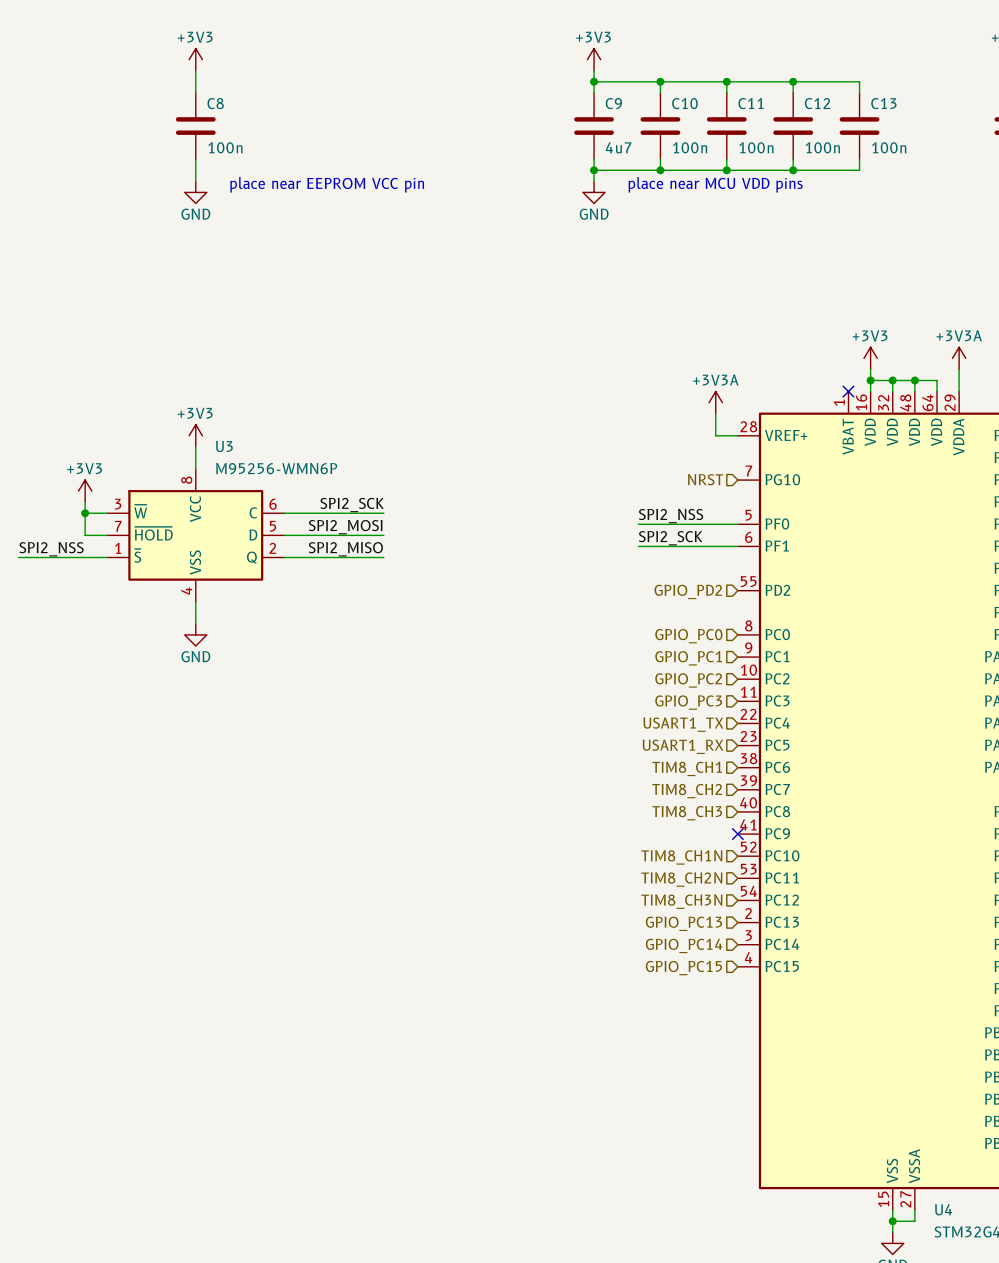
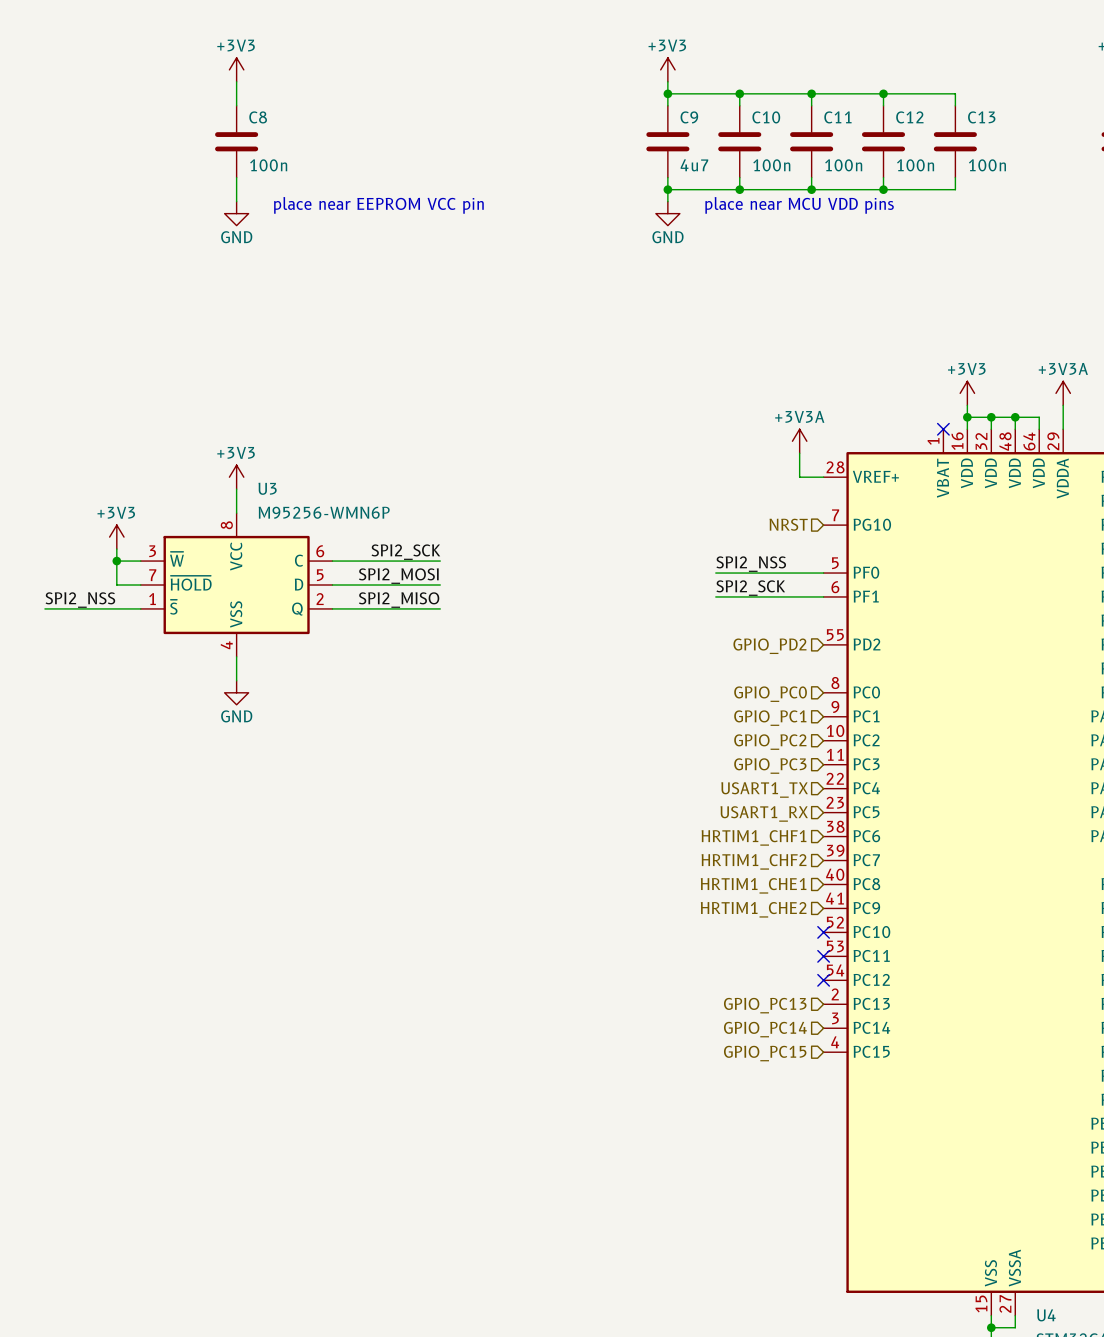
hierarchical label: TIM8_CH1 (687, 768) -> HRTIM1_CHF1 (754, 837)
hierarchical label: TIM8_CH2 (687, 791) -> HRTIM1_CHF2 (754, 861)
hierarchical label: TIM8_CH3 (687, 813) -> HRTIM1_CHE1 (753, 885)
no-connect mark: (737, 834) -> none
hierarchical label: none -> HRTIM1_CHE2 (753, 909)
no-connect mark: none -> (823, 932)
hierarchical label: TIM8_CH1N (681, 857) -> none
no-connect mark: none -> (823, 956)
hierarchical label: TIM8_CH2N (681, 879) -> none
no-connect mark: none -> (823, 980)
hierarchical label: TIM8_CH3N (681, 901) -> none

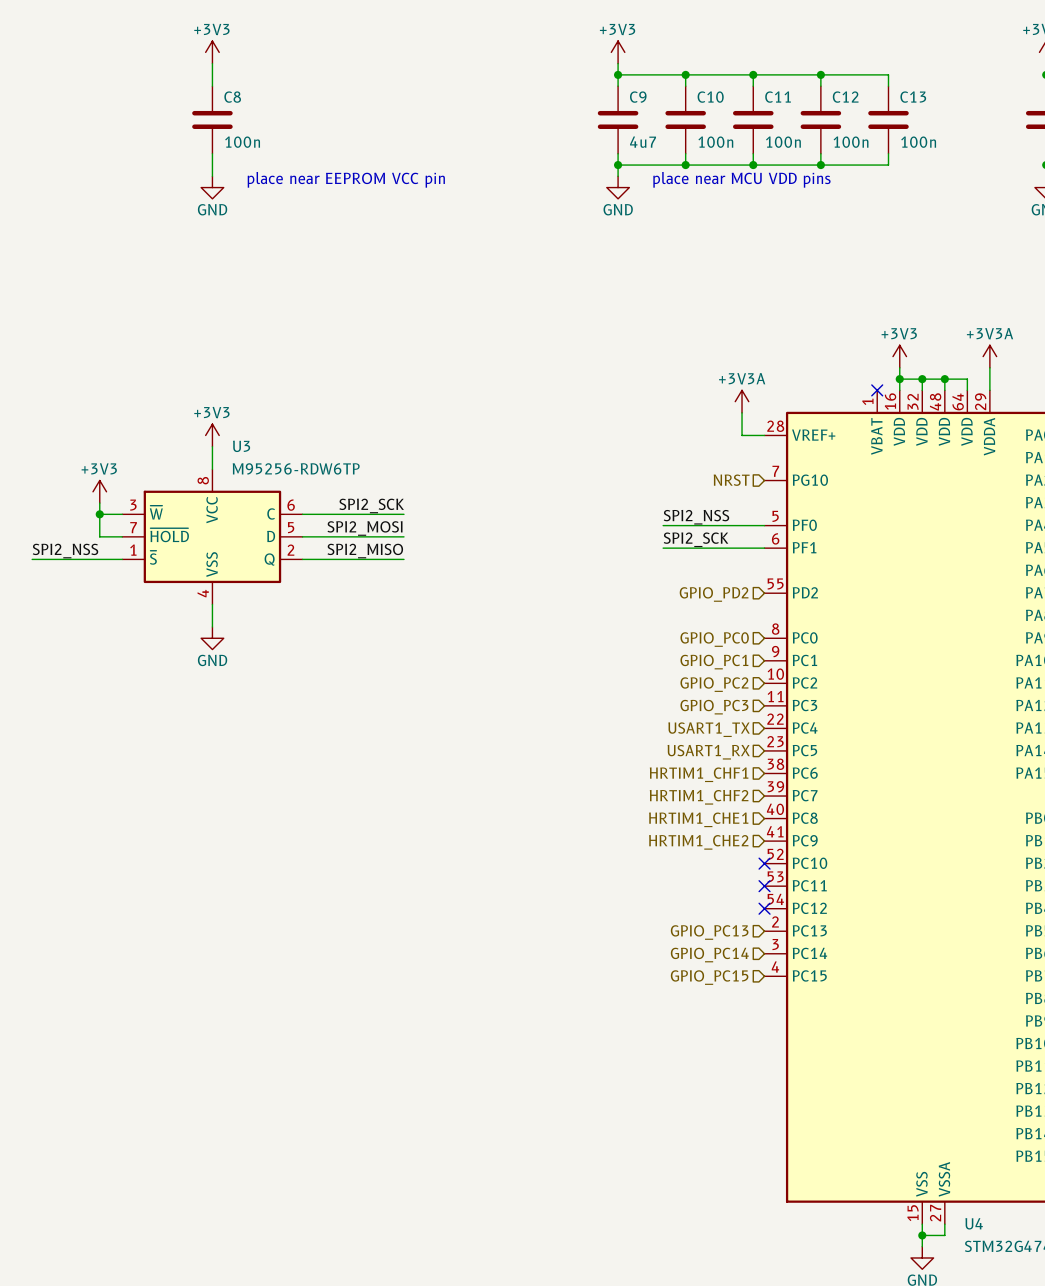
U3 value: M95256-WMN6P (324, 512) -> M95256-RDW6TP (296, 468)

